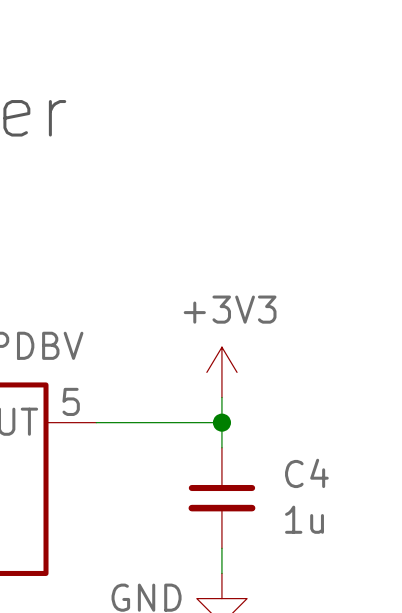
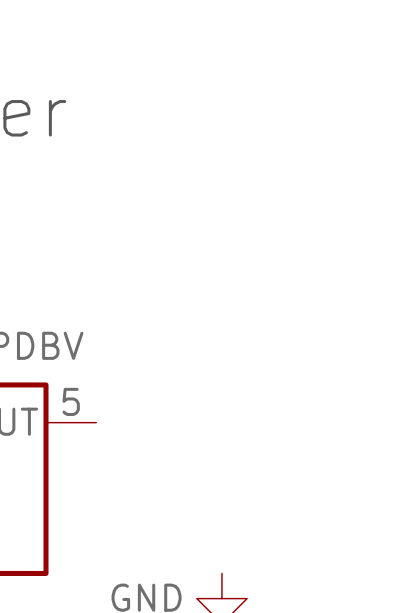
power symbol: +3V3 (221, 372) -> none
wire: (221, 397) (221, 447) -> none
wire: (96, 422) (221, 422) -> none
junction: (221, 422) -> none
C4: 1u (221, 498) -> none
wire: (221, 548) (221, 573) -> none

